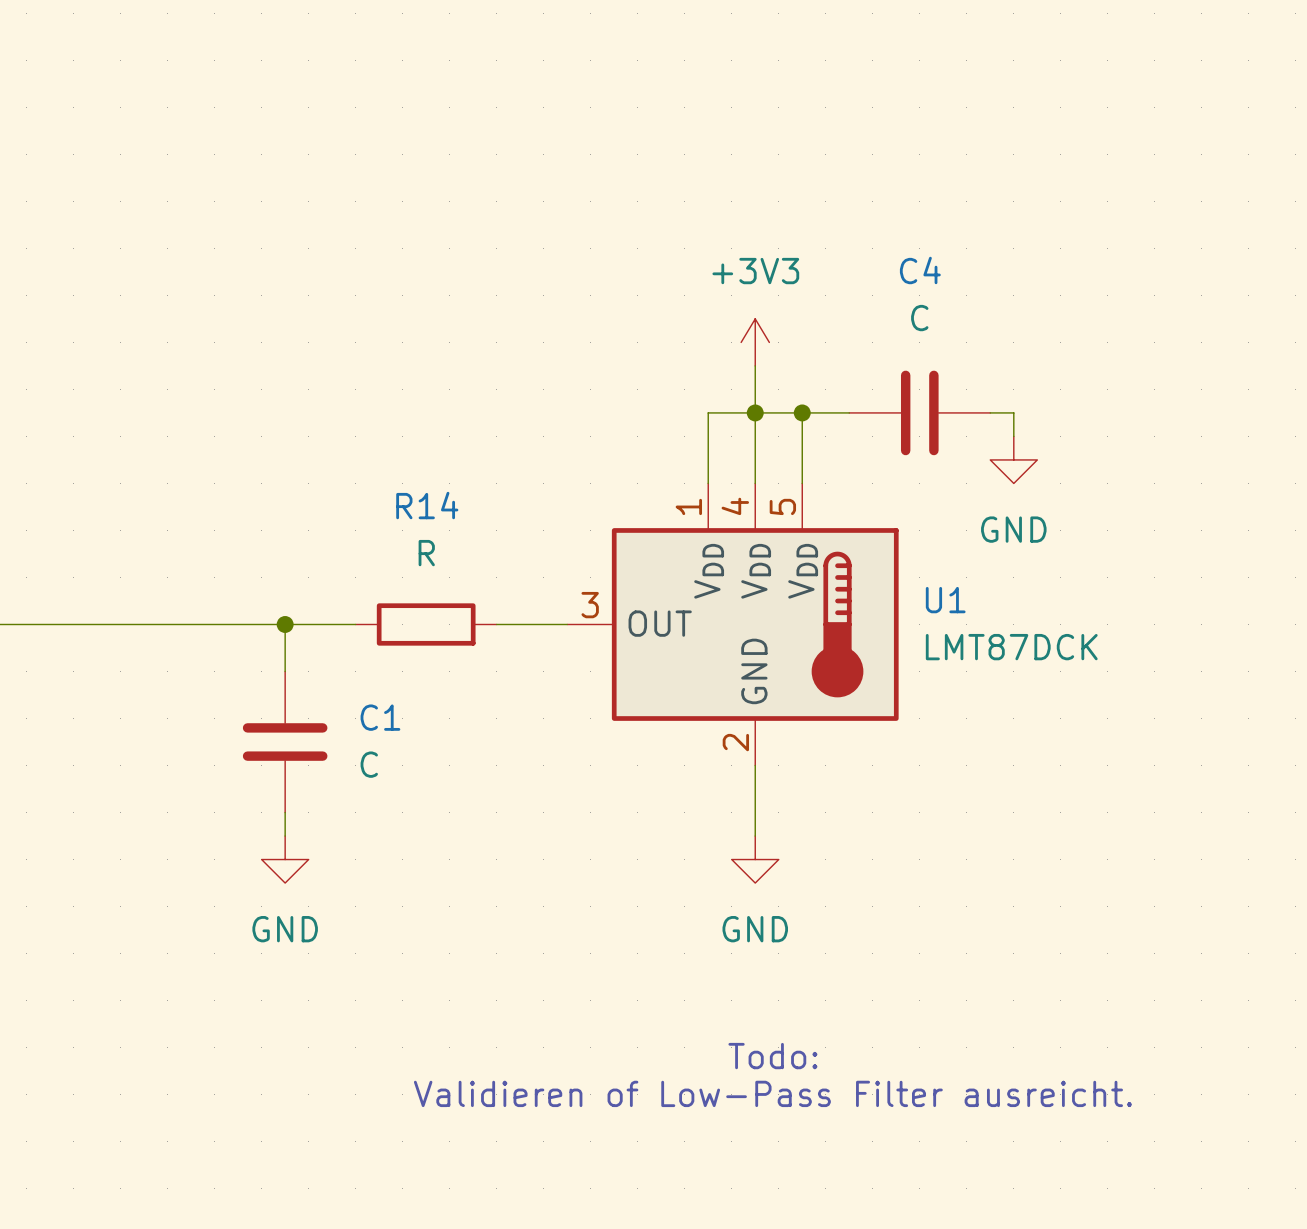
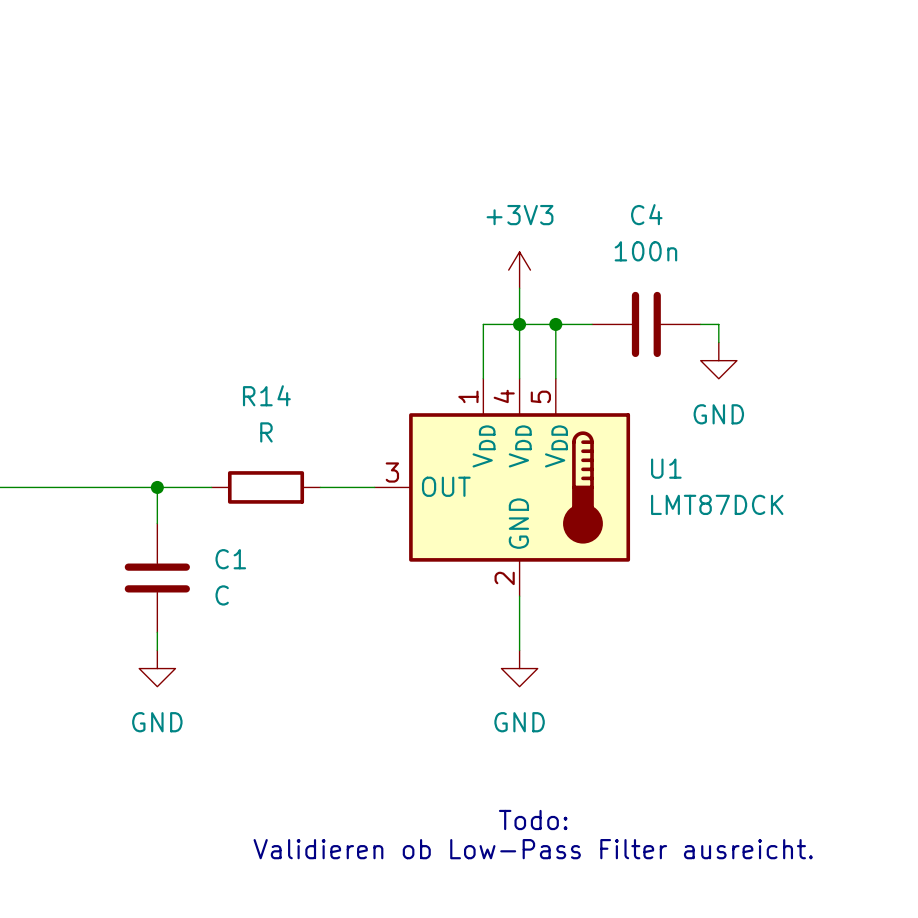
C4 value: C (919, 318) -> 100n (645, 251)
text: Validieren of Low-Pass Filter ausreicht. (772, 1093) -> Validieren ob Low-Pass Filter ausreicht. (533, 849)

